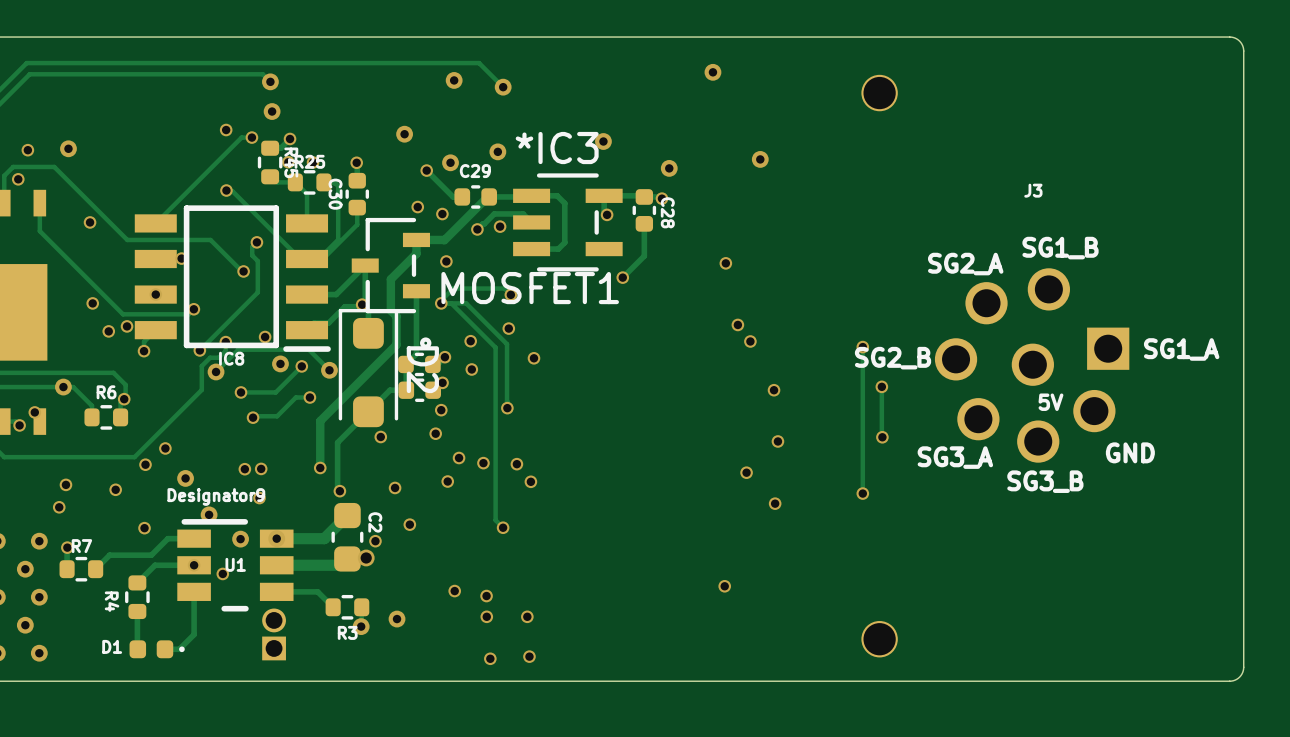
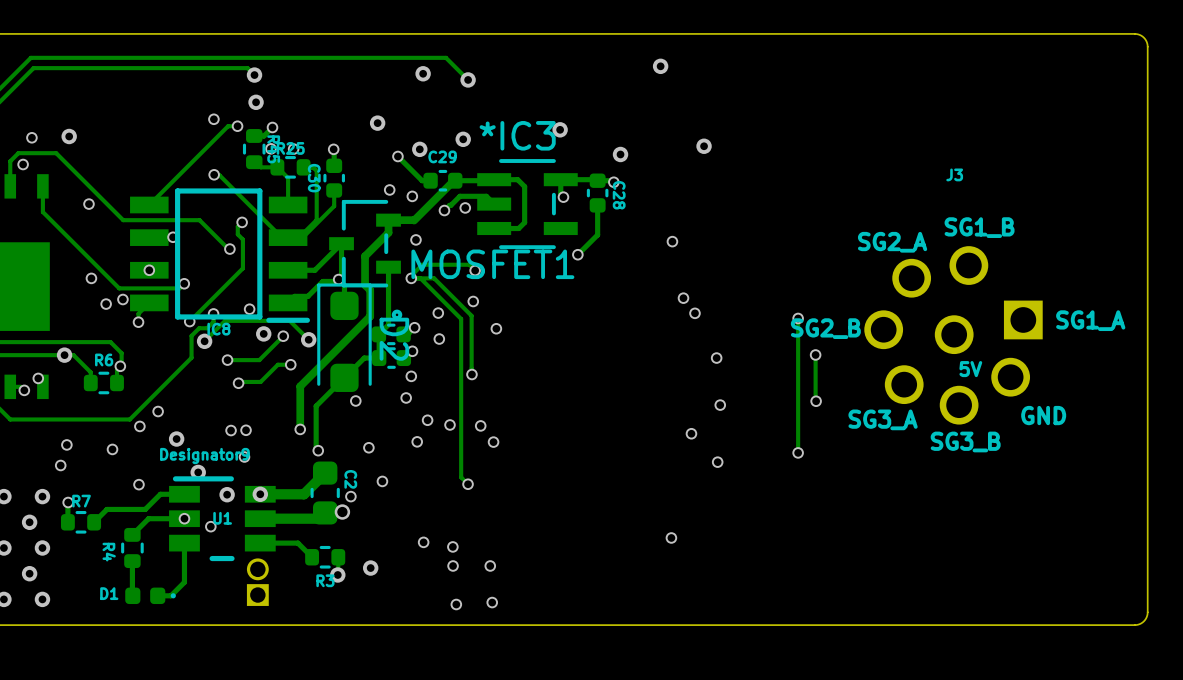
part: (879, 93) -> none
part: (879, 639) -> none

